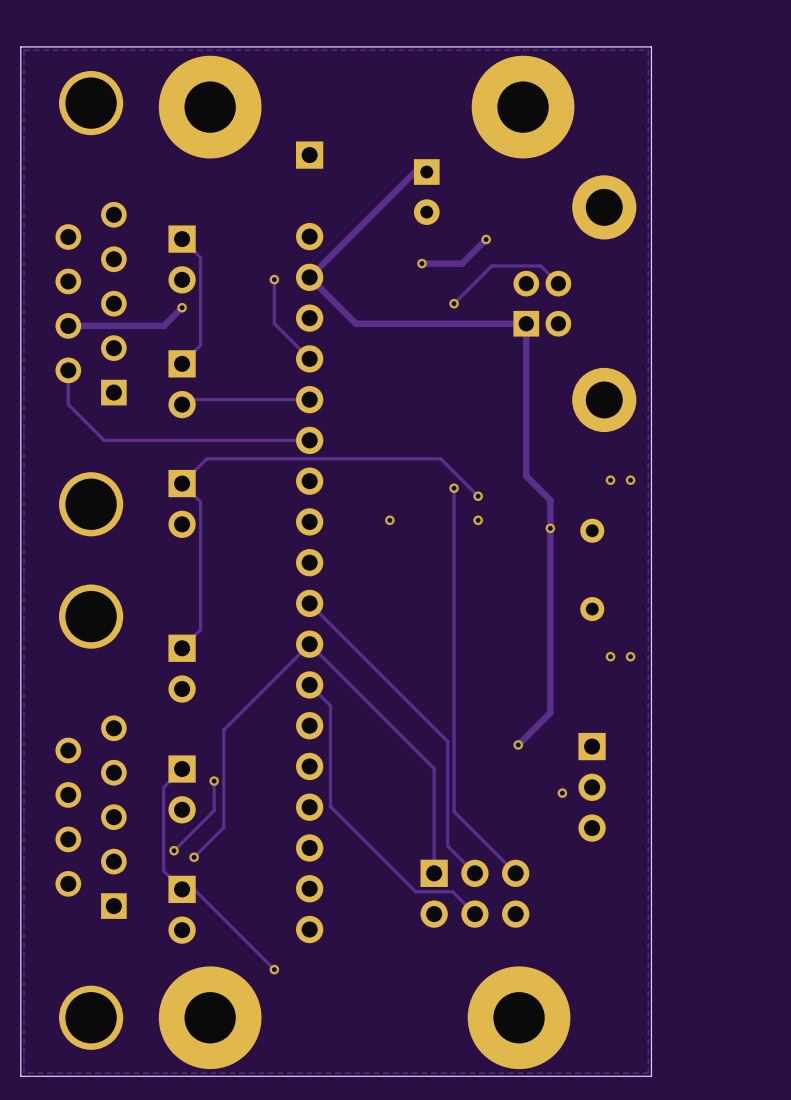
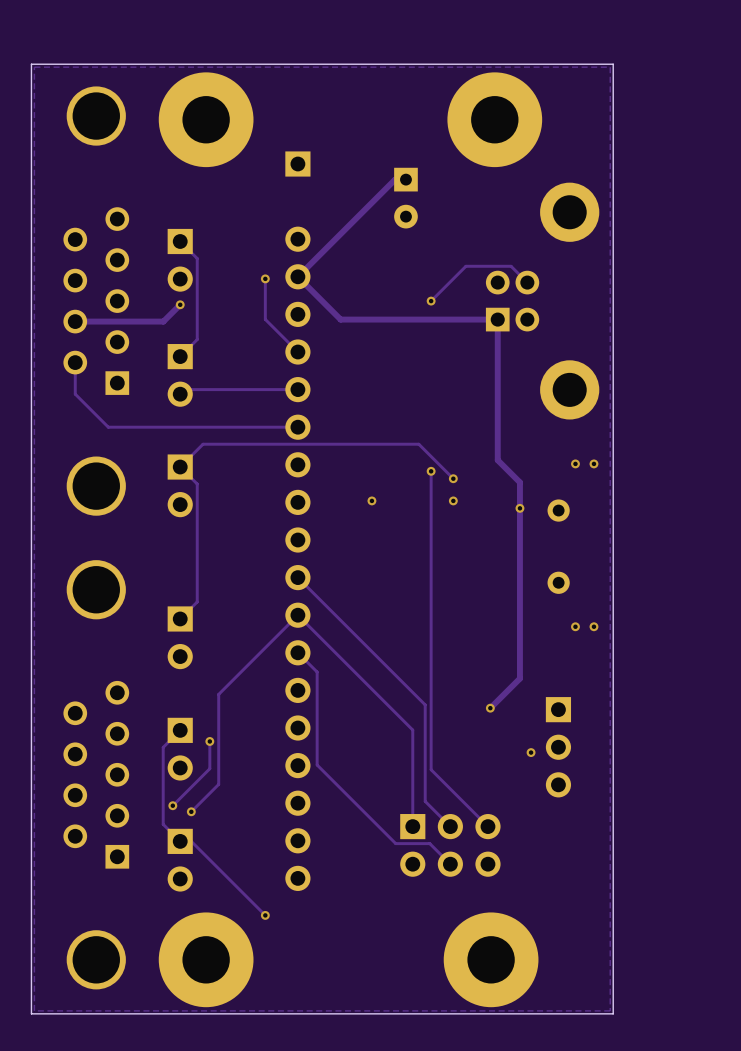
track: (486, 239) (462, 263) (421, 263) -> none
via: (486, 239) -> none
via: (421, 263) -> none

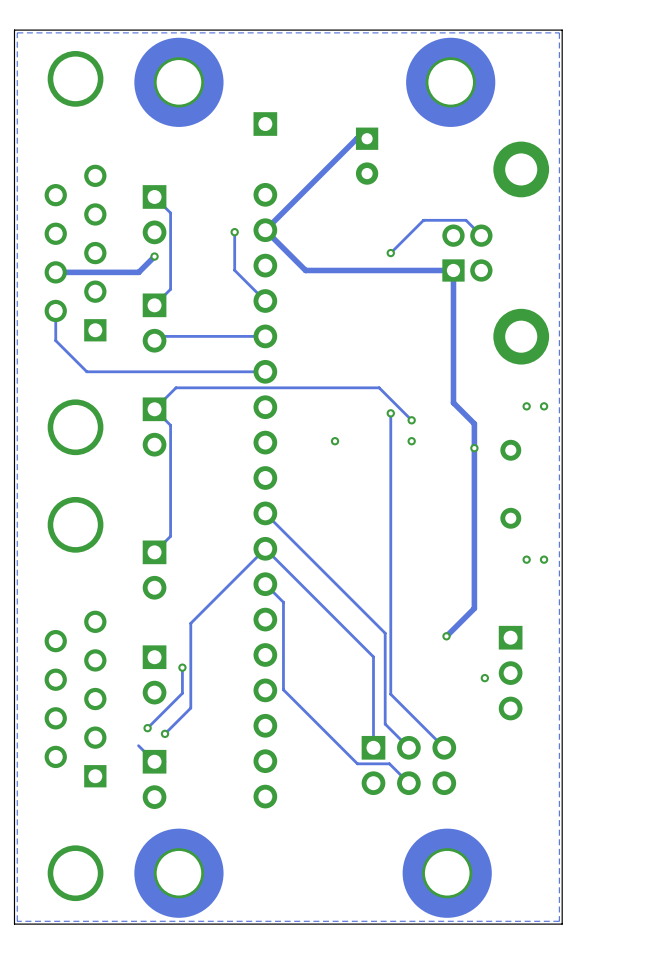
track: (180, 730) (163, 747) (163, 824) -> none
track: (191, 841) (265, 915) -> none
via: (265, 915) -> none

